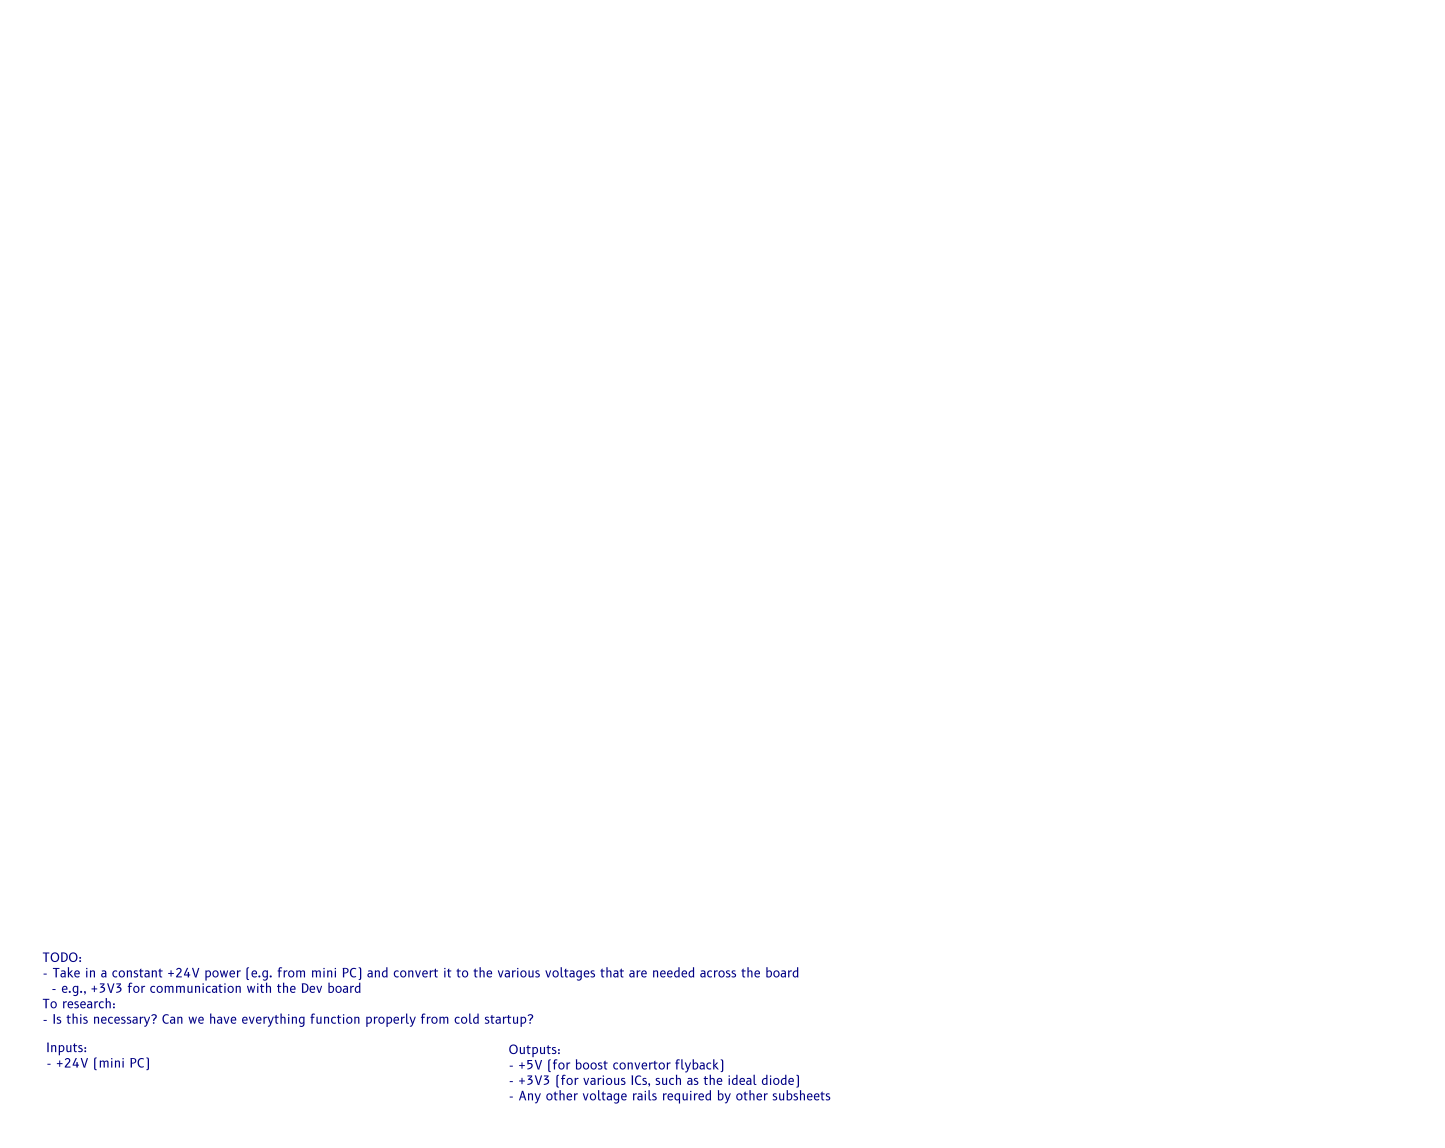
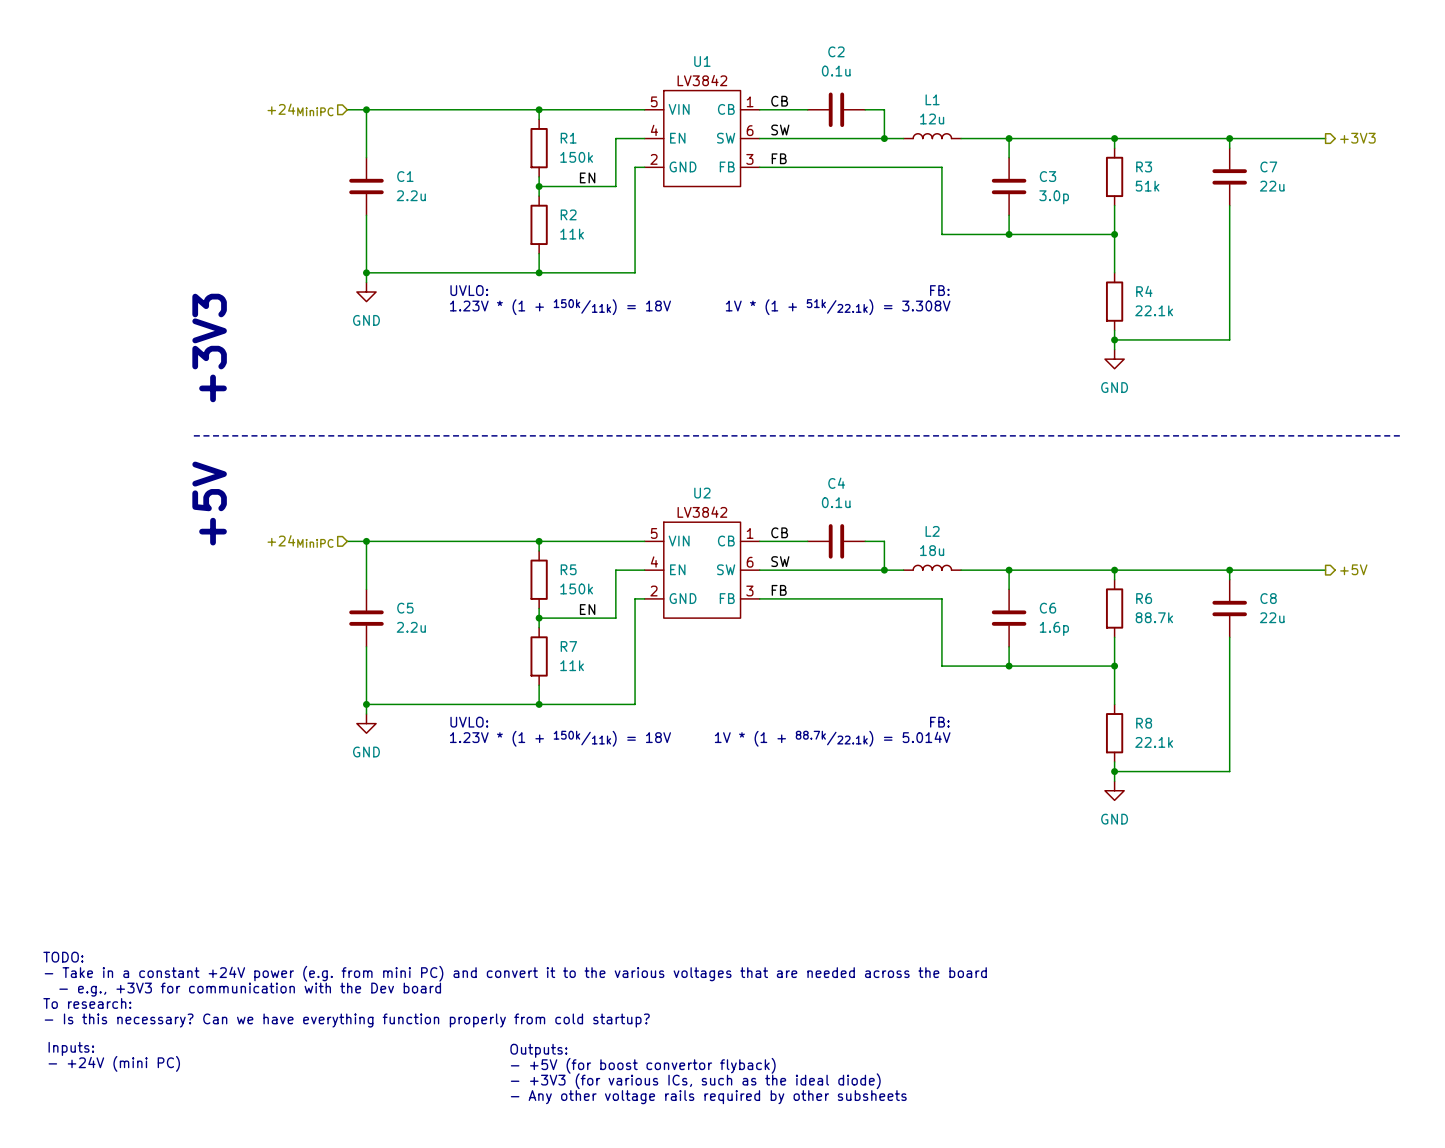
label: none -> CB (779, 101)
wire: none -> (347, 109) (644, 109)
wire: none -> (366, 109) (366, 157)
junction: none -> (366, 109)
wire: none -> (539, 109) (539, 119)
junction: none -> (539, 109)
wire: none -> (759, 109) (807, 109)
C2: none -> 0.1u (836, 109)
wire: none -> (865, 109) (884, 109) (884, 138)
hierarchical label: none -> +24MiniPC (300, 109)
label: none -> SW (780, 129)
L1: none -> 12u (932, 136)
wire: none -> (644, 138) (615, 138) (615, 186) (539, 186)
U1: none -> (702, 138)
wire: none -> (759, 138) (903, 138)
junction: none -> (884, 138)
wire: none -> (961, 138) (1325, 138)
wire: none -> (1009, 138) (1009, 157)
junction: none -> (1009, 138)
wire: none -> (1114, 138) (1114, 148)
junction: none -> (1114, 138)
wire: none -> (1229, 138) (1229, 148)
junction: none -> (1229, 138)
hierarchical label: none -> +3V3 (1357, 138)
R1: none -> 150k (539, 148)
label: none -> FB (779, 158)
wire: none -> (644, 167) (635, 167) (635, 272) (366, 272)
wire: none -> (759, 167) (941, 167) (941, 234) (1114, 234)
wire: none -> (539, 176) (539, 196)
R3: none -> 51k (1114, 176)
C7: none -> 22u (1229, 176)
label: none -> EN (587, 177)
C1: none -> 2.2u (366, 186)
junction: none -> (539, 186)
C3: none -> 3.0p (1009, 186)
wire: none -> (1114, 205) (1114, 272)
wire: none -> (1229, 205) (1229, 339) (1114, 339)
wire: none -> (366, 215) (366, 282)
wire: none -> (1009, 215) (1009, 234)
R2: none -> 11k (539, 224)
junction: none -> (1009, 234)
junction: none -> (1114, 234)
wire: none -> (539, 253) (539, 272)
junction: none -> (366, 272)
junction: none -> (539, 272)
text: none -> UVLO: (469, 290)
text: none -> FB: (939, 290)
power symbol: none -> GND (366, 292)
R4: none -> 22.1k (1114, 301)
text: none -> 1.23V * (1 + 150k/11k) = 18V (560, 307)
text: none -> 1V * (1 + 51k/22.1k) = 3.308V (838, 307)
wire: none -> (1114, 330) (1114, 349)
junction: none -> (1114, 339)
power symbol: none -> GND (1114, 359)
text: none -> +3V3 (209, 347)
line: none -> (193, 435) (1402, 435)
text: none -> +5V (209, 503)
label: none -> CB (779, 532)
hierarchical label: none -> +24MiniPC (300, 541)
wire: none -> (347, 541) (644, 541)
wire: none -> (366, 541) (366, 589)
junction: none -> (366, 541)
wire: none -> (539, 541) (539, 550)
junction: none -> (539, 541)
wire: none -> (759, 541) (807, 541)
C4: none -> 0.1u (836, 541)
wire: none -> (865, 541) (884, 541) (884, 570)
label: none -> SW (780, 561)
L2: none -> 18u (932, 567)
hierarchical label: none -> +5V (1353, 569)
wire: none -> (644, 570) (615, 570) (615, 618) (539, 618)
U2: none -> (702, 570)
wire: none -> (759, 570) (903, 570)
junction: none -> (884, 570)
wire: none -> (961, 570) (1325, 570)
wire: none -> (1009, 570) (1009, 589)
junction: none -> (1009, 570)
wire: none -> (1114, 570) (1114, 579)
junction: none -> (1114, 570)
wire: none -> (1229, 570) (1229, 579)
junction: none -> (1229, 570)
R5: none -> 150k (539, 579)
label: none -> FB (779, 590)
wire: none -> (644, 598) (635, 598) (635, 704) (366, 704)
wire: none -> (759, 598) (941, 598) (941, 666) (1114, 666)
wire: none -> (539, 608) (539, 627)
R6: none -> 88.7k (1114, 608)
C8: none -> 22u (1229, 608)
label: none -> EN (587, 609)
C5: none -> 2.2u (366, 618)
junction: none -> (539, 618)
C6: none -> 1.6p (1009, 618)
wire: none -> (1114, 637) (1114, 704)
wire: none -> (1229, 637) (1229, 771) (1114, 771)
wire: none -> (366, 646) (366, 714)
wire: none -> (1009, 646) (1009, 666)
R7: none -> 11k (539, 656)
junction: none -> (1009, 666)
junction: none -> (1114, 666)
wire: none -> (539, 685) (539, 704)
junction: none -> (366, 704)
junction: none -> (539, 704)
text: none -> UVLO: (469, 722)
text: none -> FB: (939, 722)
power symbol: none -> GND (366, 723)
R8: none -> 22.1k (1114, 733)
text: none -> 1.23V * (1 + 150k/11k) = 18V (560, 738)
text: none -> 1V * (1 + 88.7k/22.1k) = 5.014V (832, 738)
wire: none -> (1114, 761) (1114, 781)
junction: none -> (1114, 771)
power symbol: none -> GND (1114, 790)

